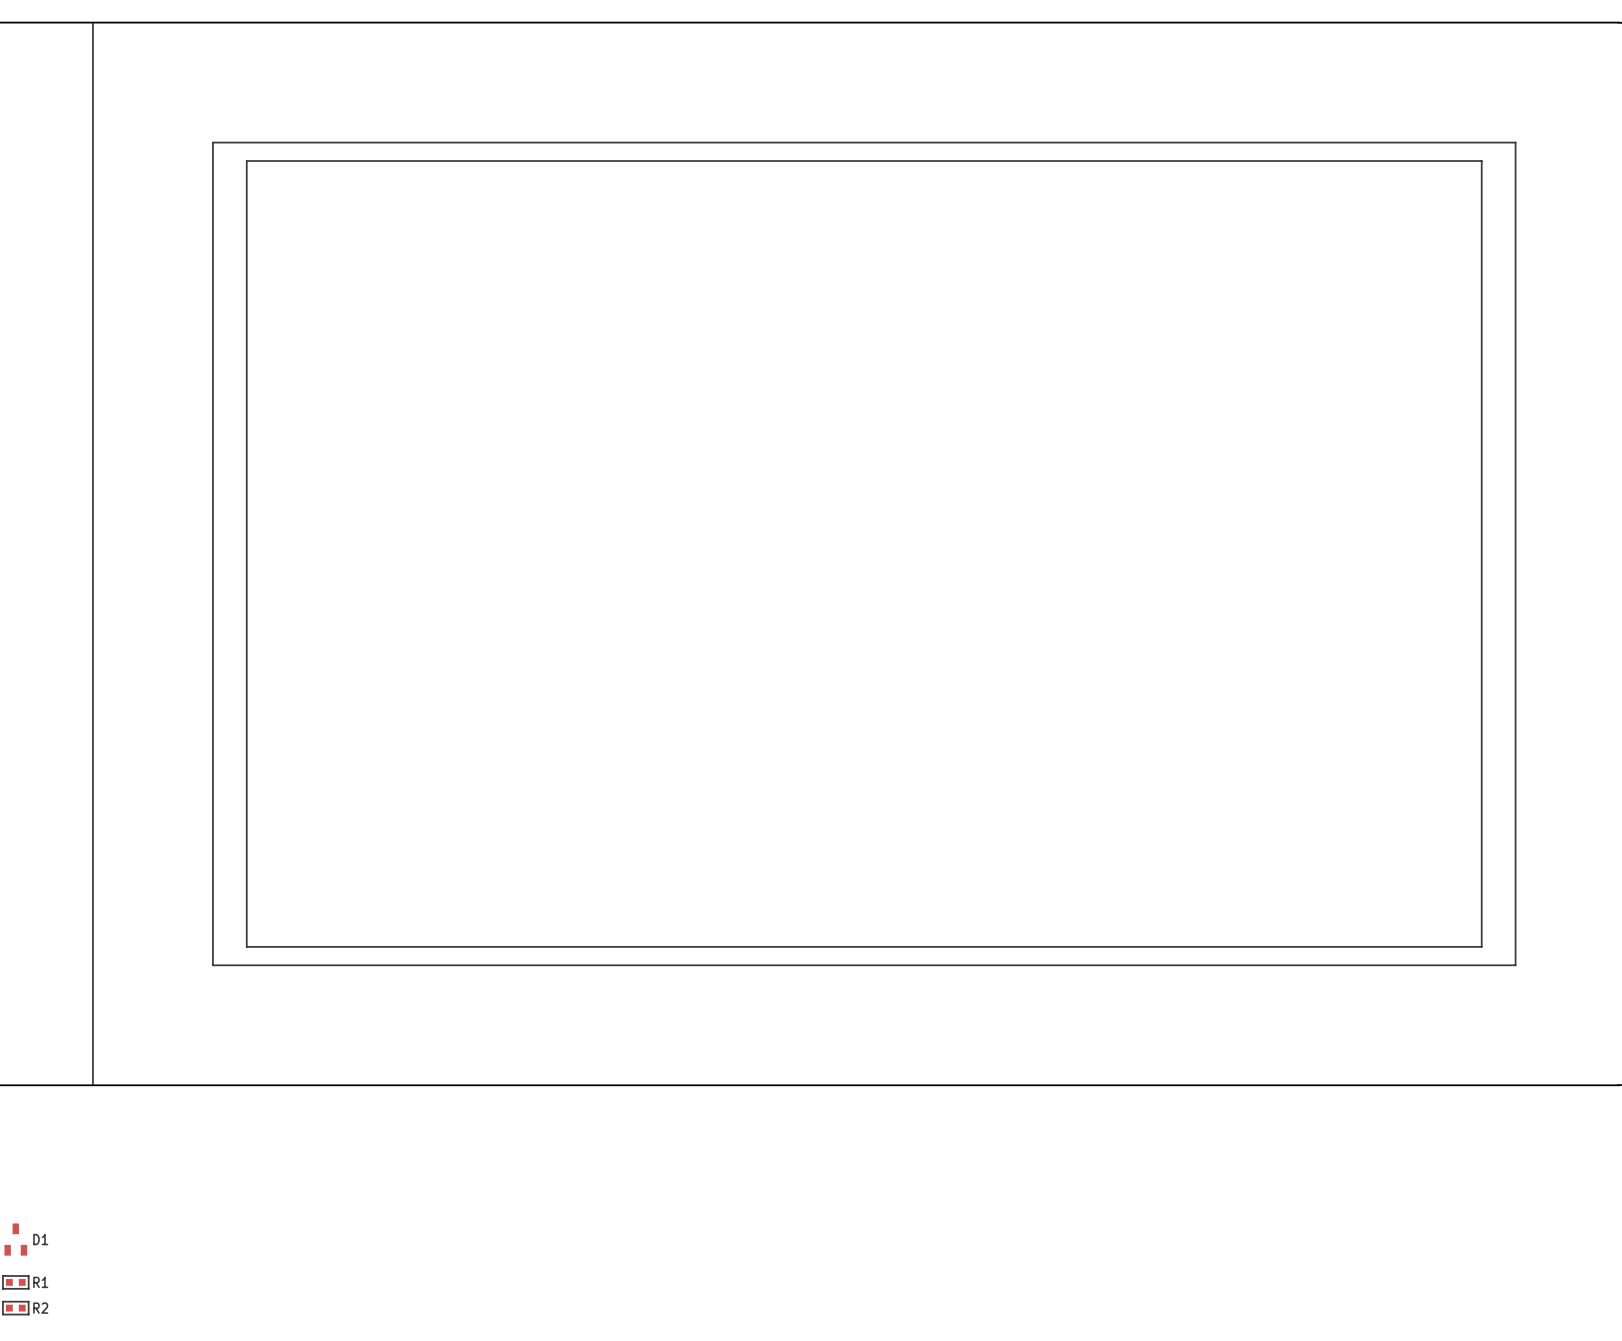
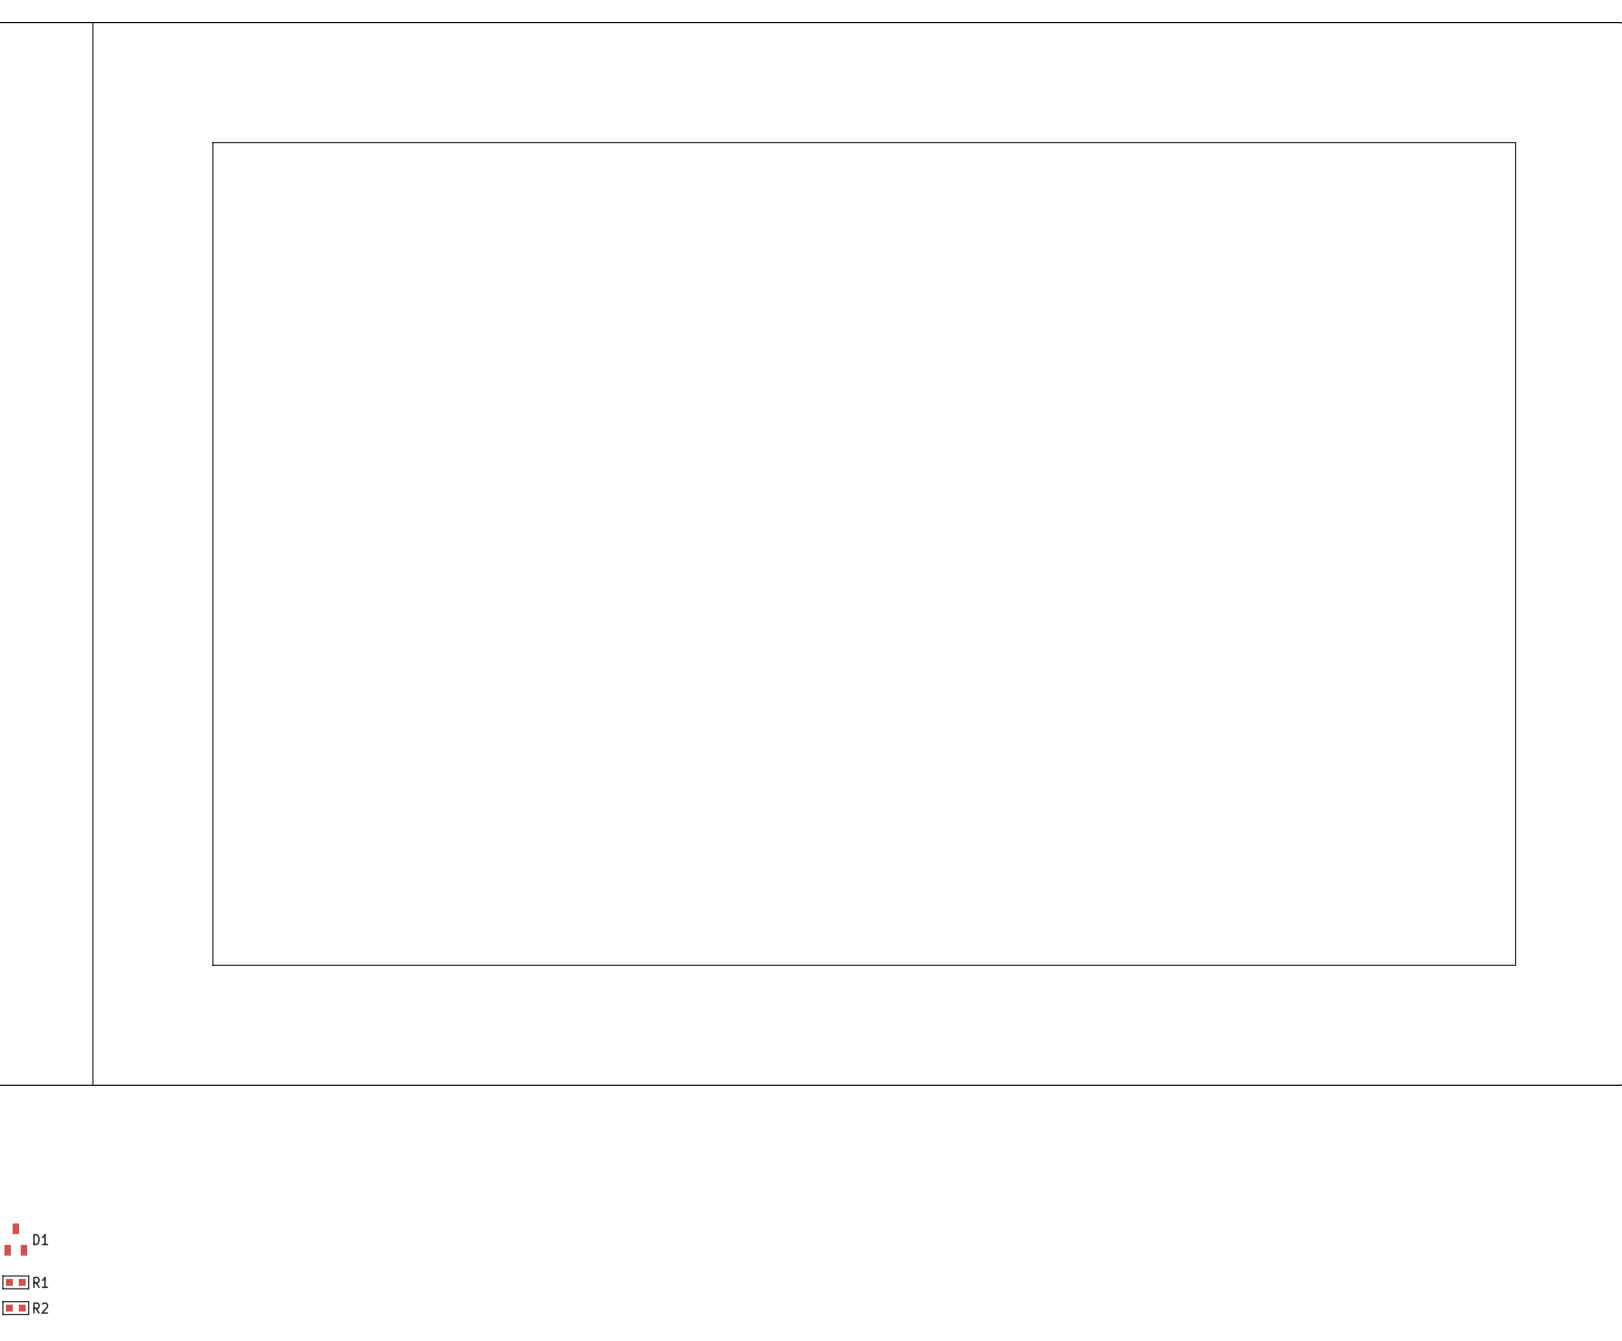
line: (246, 161) (1481, 161) (1481, 946) (246, 946) (246, 161) -> none

